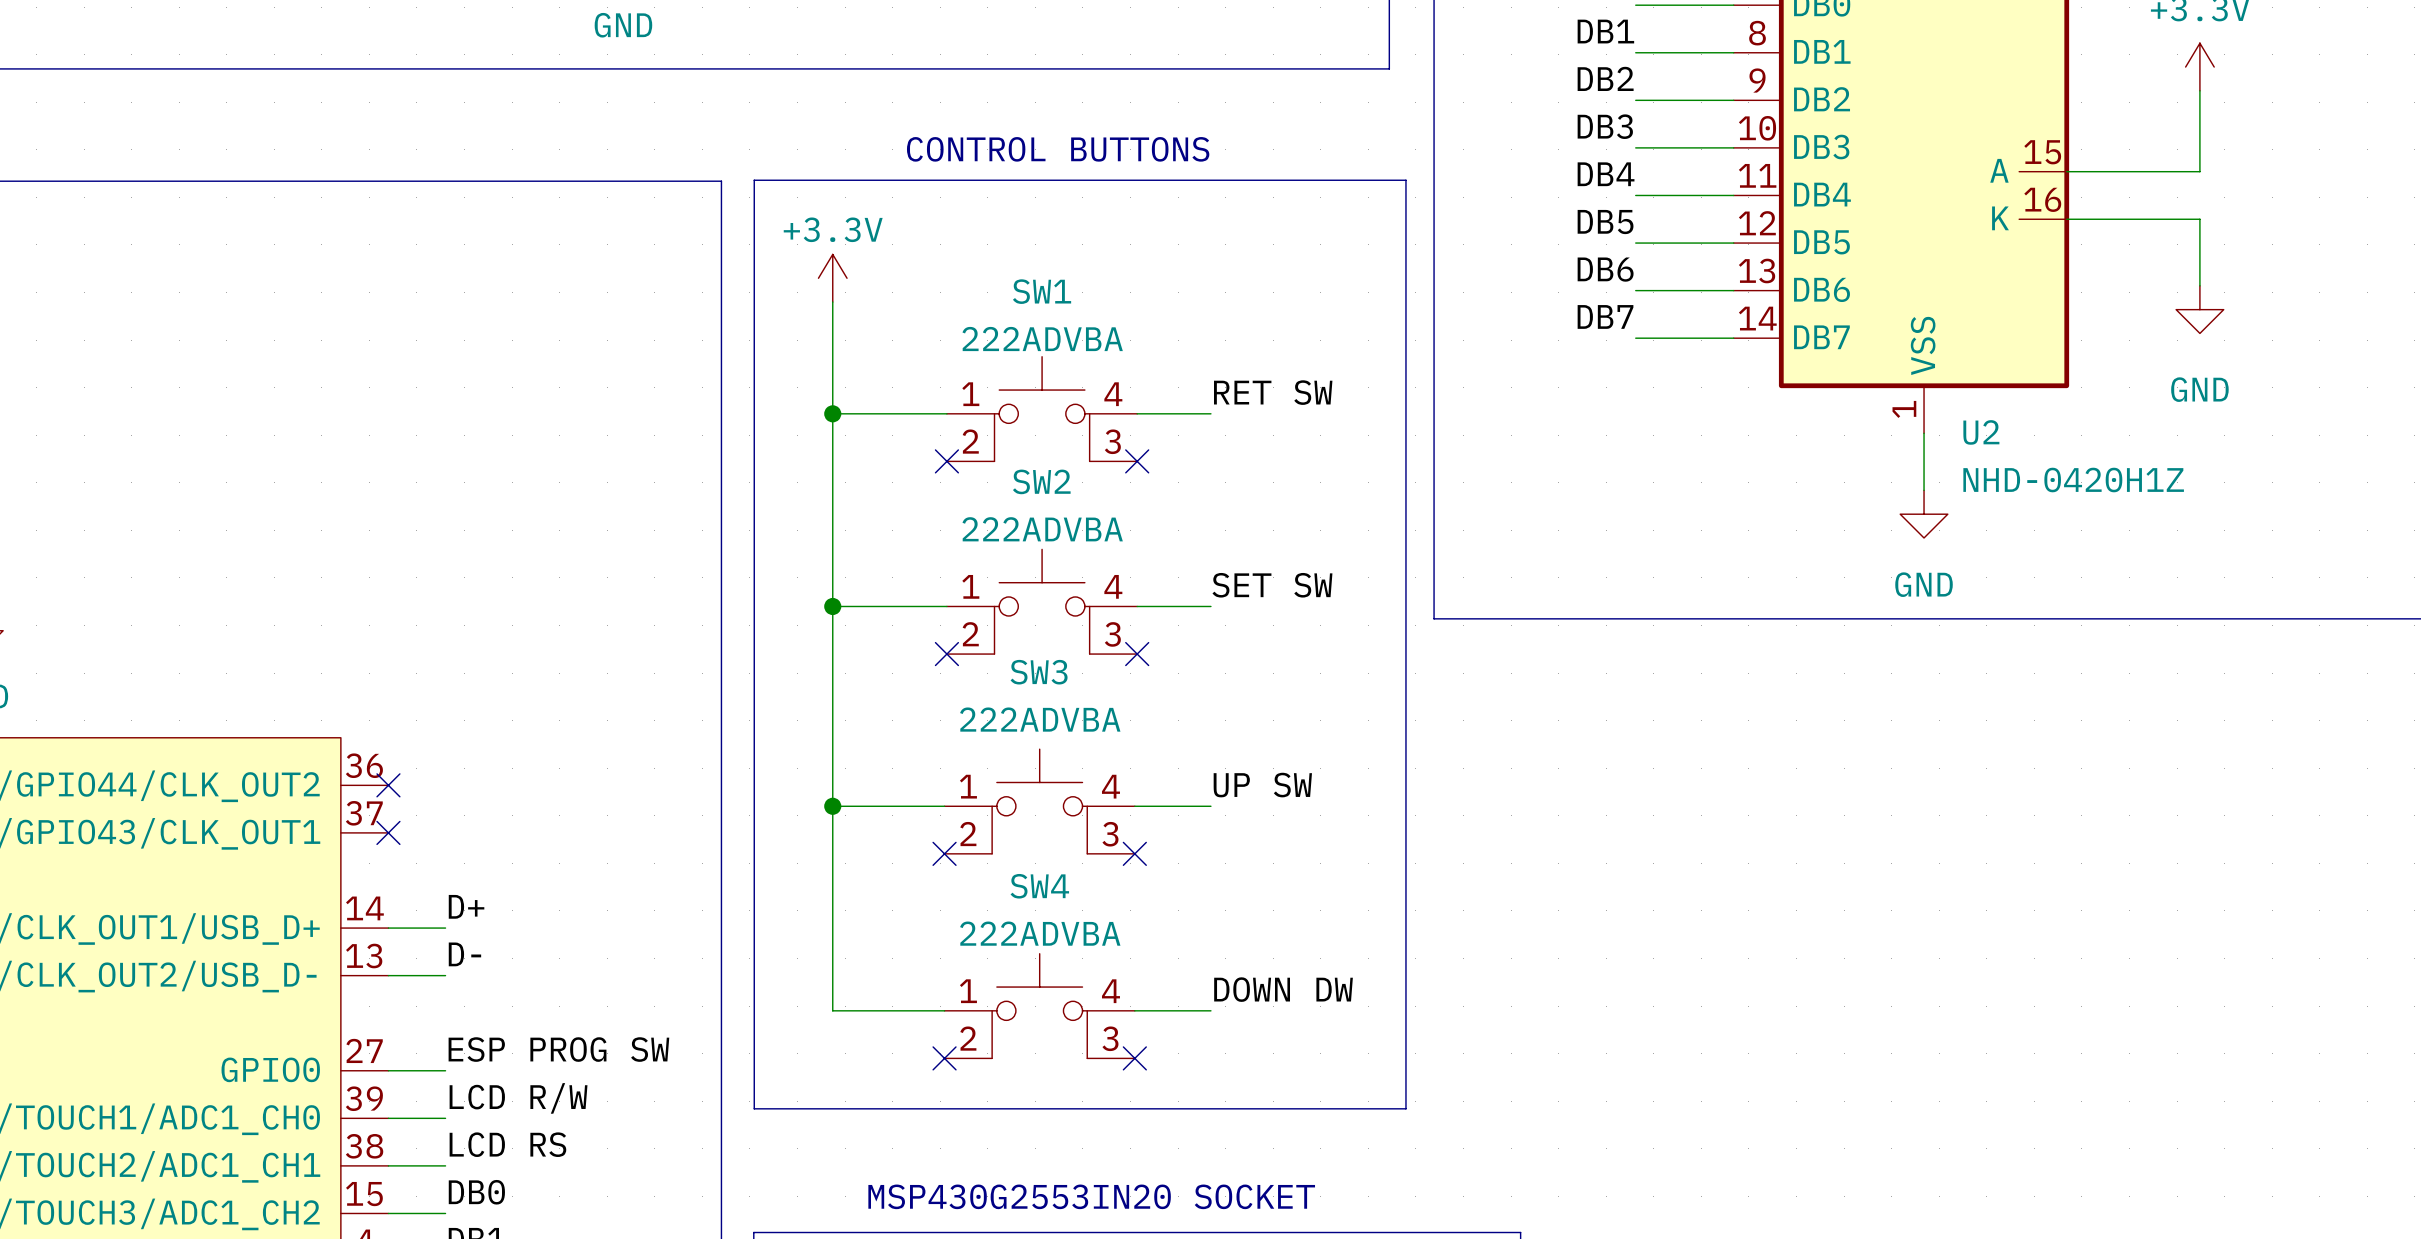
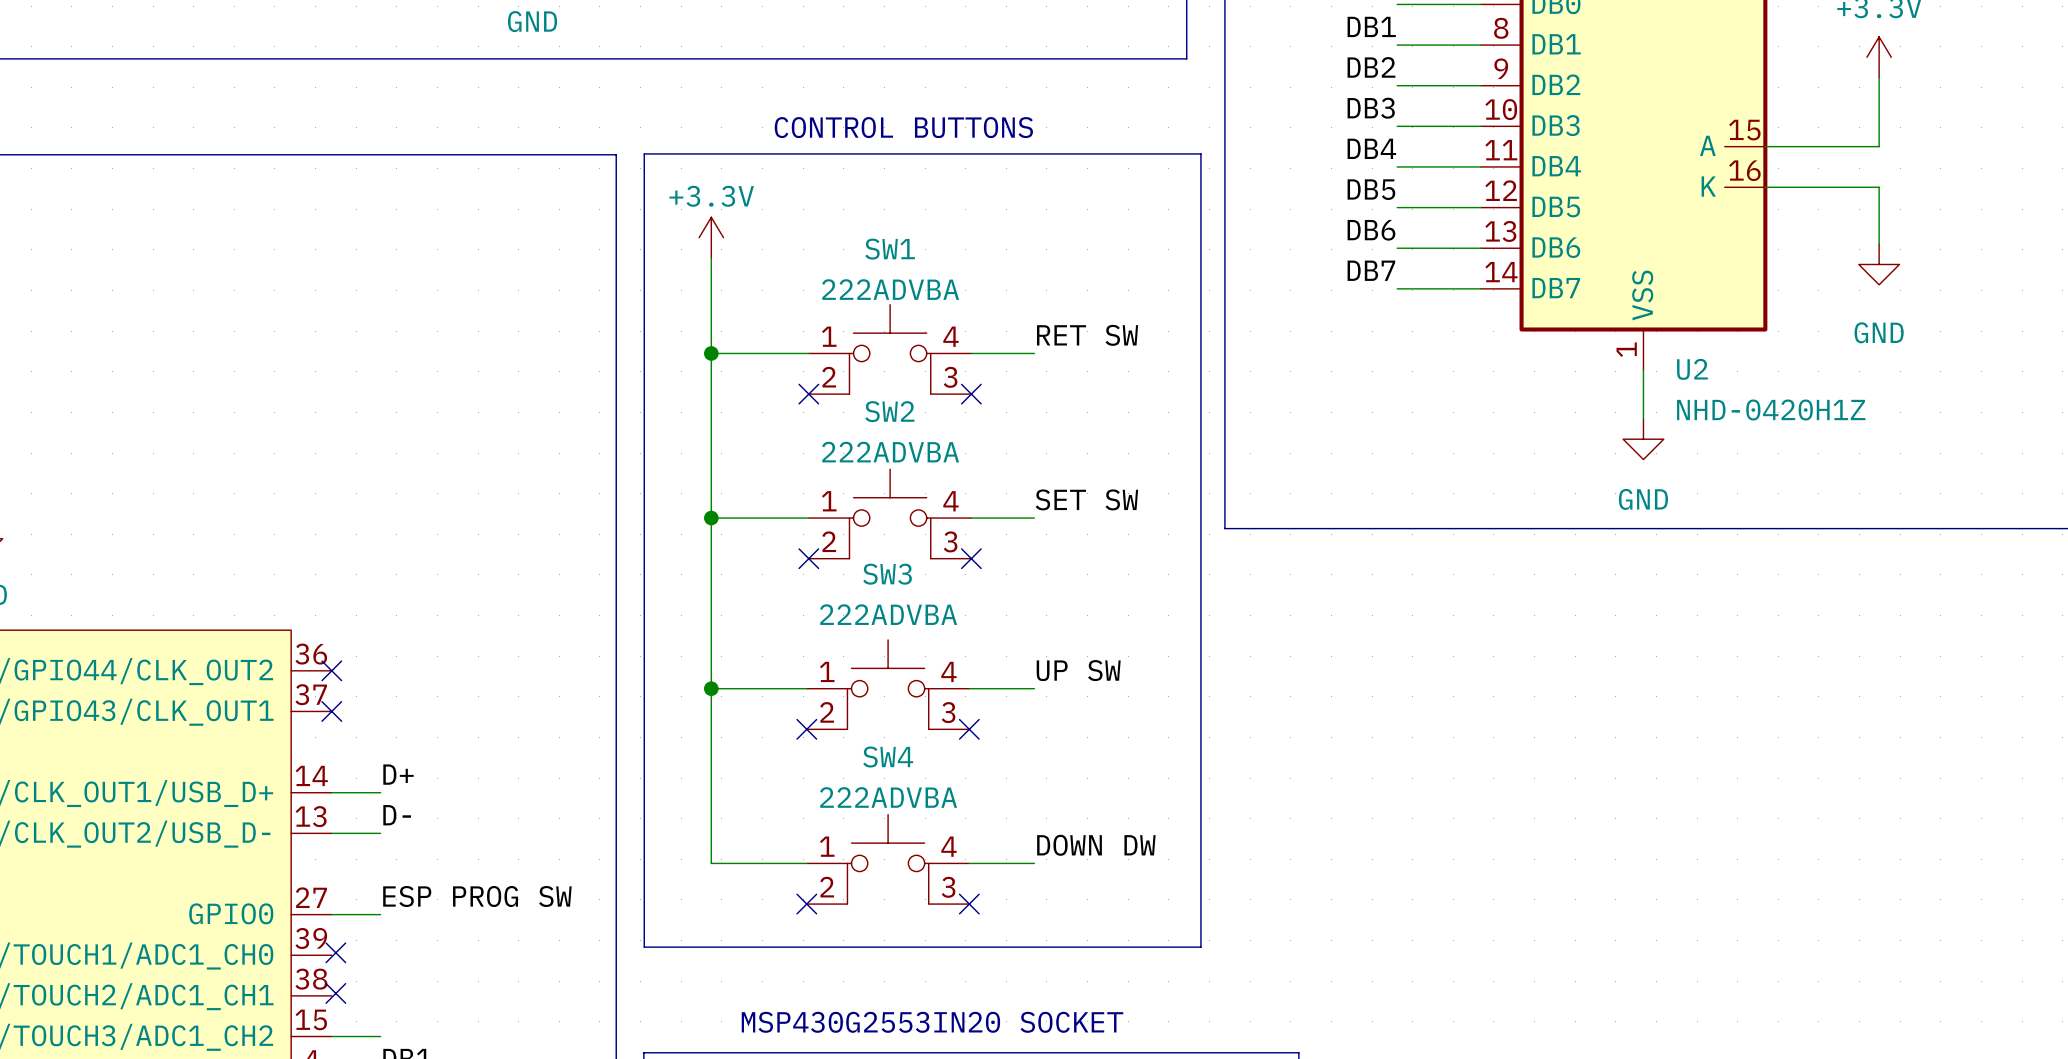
label: LCD R/W (518, 1098) -> none
no-connect mark: none -> (335, 952)
wire: (388, 1118) (445, 1118) -> none
label: LCD RS (507, 1144) -> none
no-connect mark: none -> (335, 993)
wire: (388, 1165) (445, 1165) -> none
label: DB0 (476, 1192) -> none

